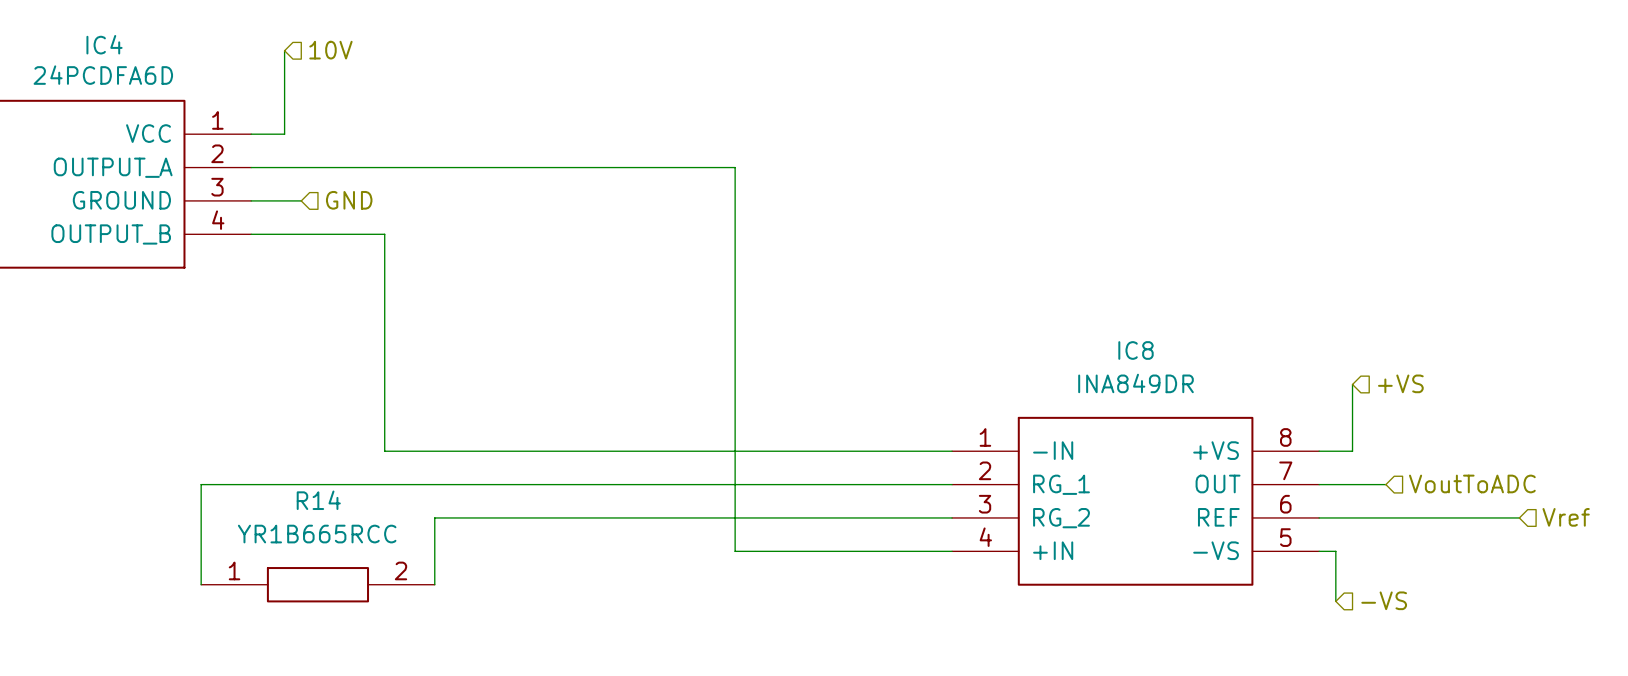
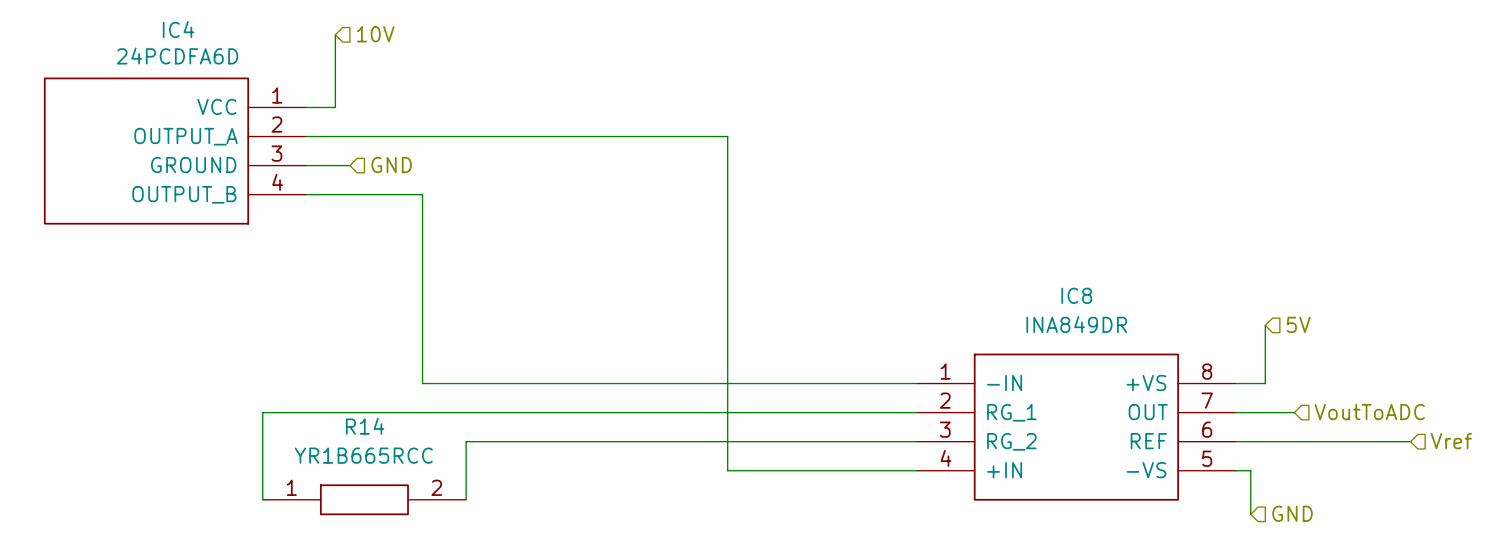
hierarchical label: +VS (1400, 383) -> 5V (1298, 324)
hierarchical label: -VS (1384, 600) -> GND (1292, 513)

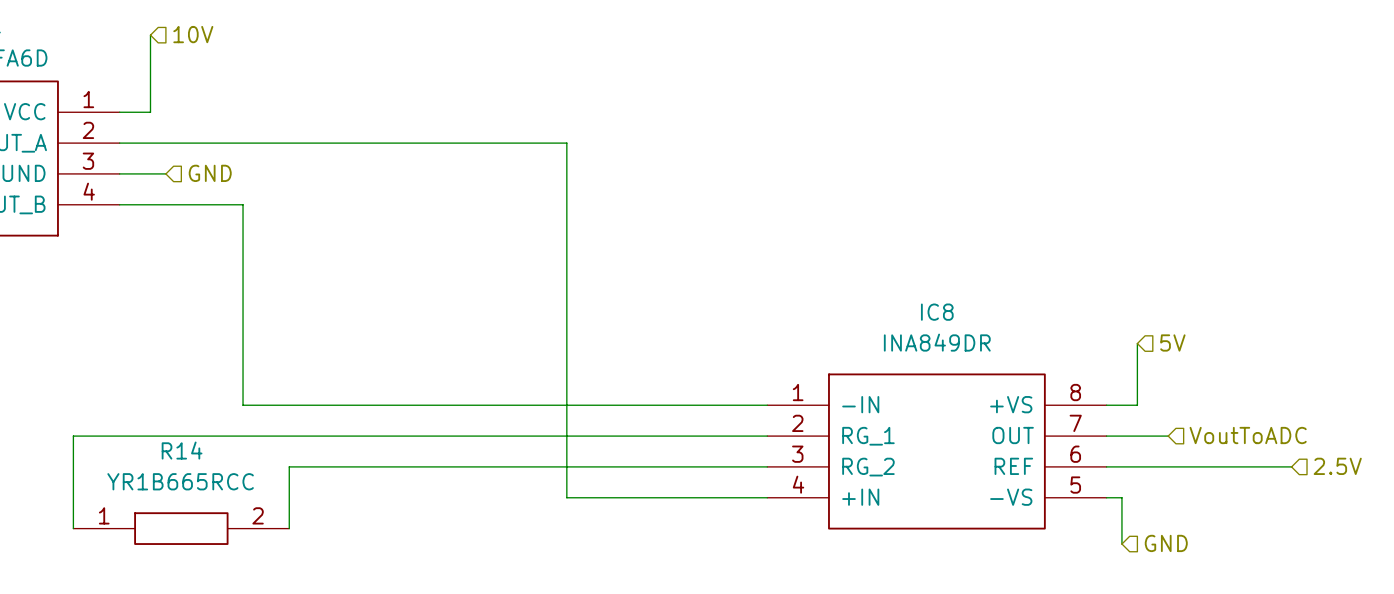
hierarchical label: Vref (1451, 441) -> 2.5V (1337, 466)

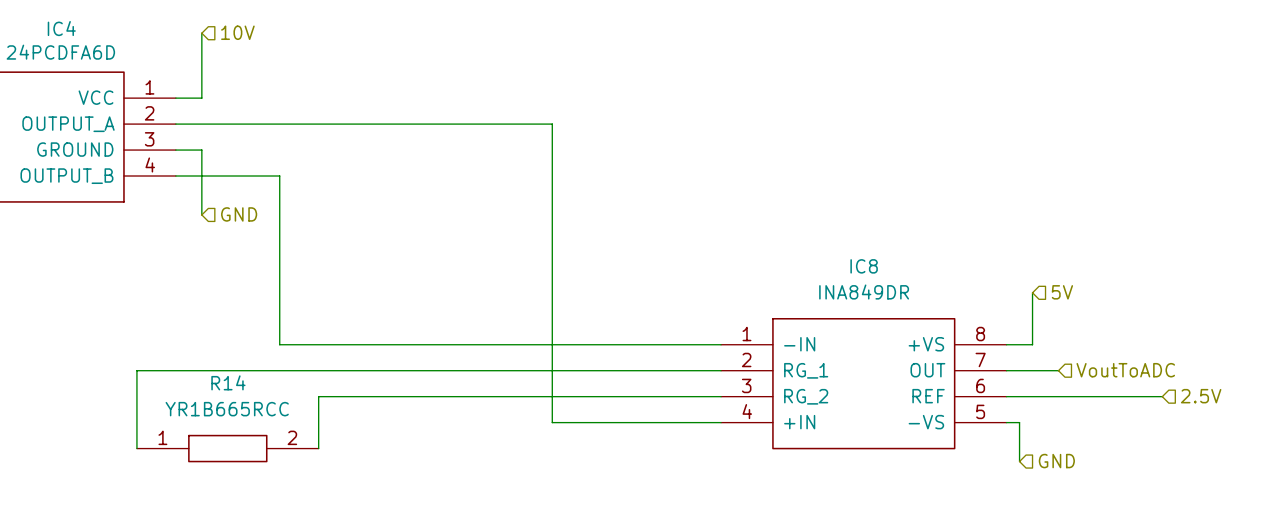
wire: (150, 173) (165, 173) -> (201, 150) (201, 214)
hierarchical label position: GND (210, 173) -> GND (239, 214)

